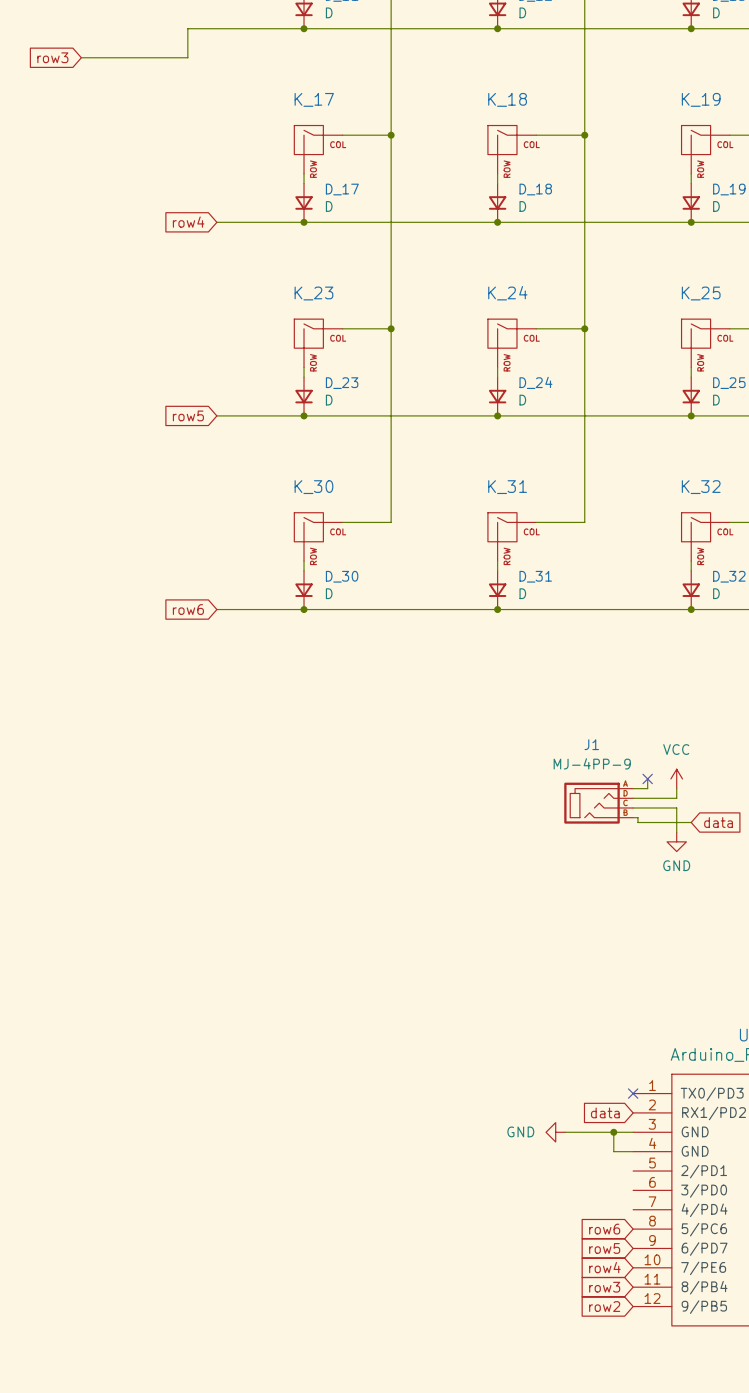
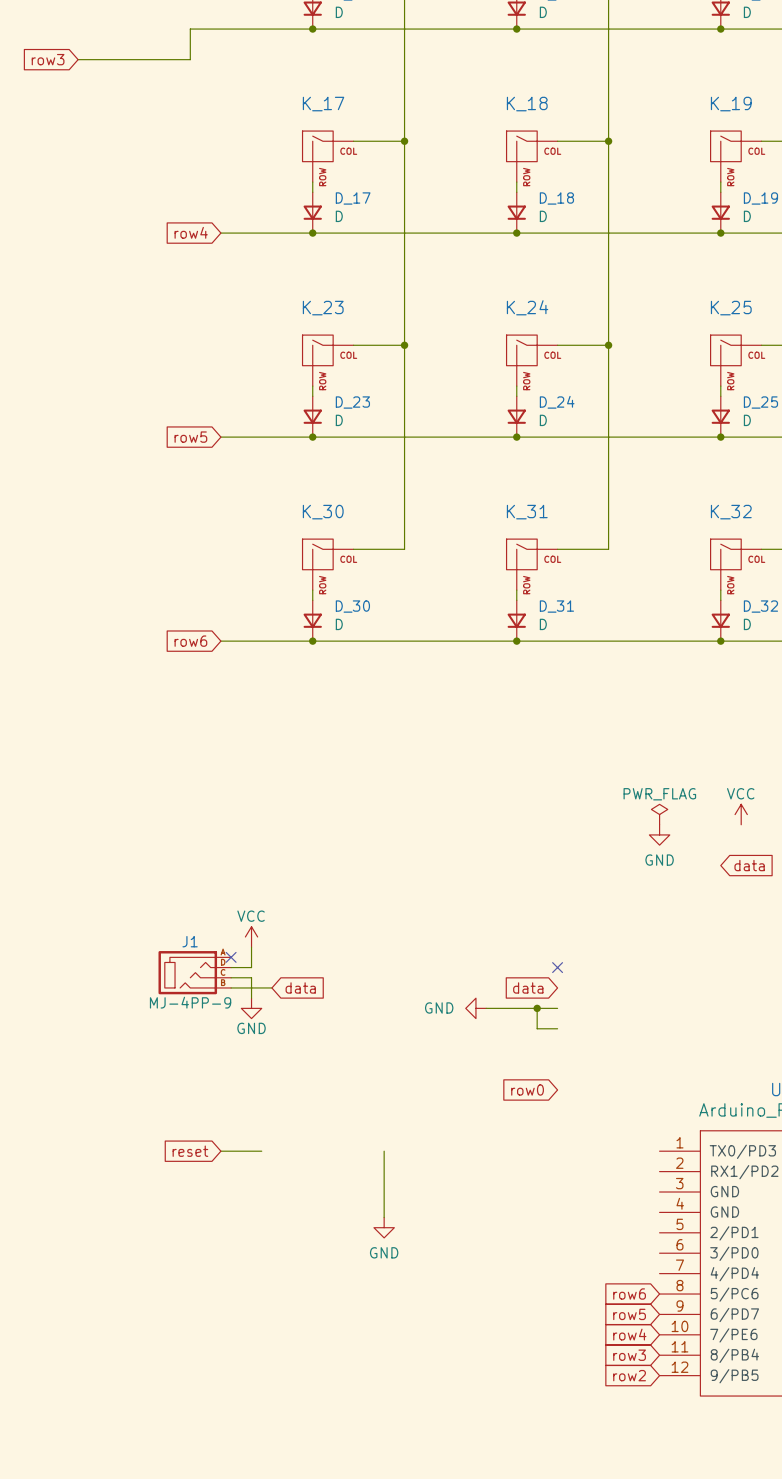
J1 name position: J1 (591, 744) -> J1 (190, 941)
power symbol text position: VCC (676, 749) -> VCC (740, 793)
J1 value position: MJ-4PP-9 (592, 763) -> MJ-4PP-9 (190, 1002)
power symbol: none -> PWR_FLAG (659, 814)
wire: (647, 778) (647, 788) (633, 788) -> none
no-connect mark: (647, 778) -> none
power symbol position: VCC (676, 778) -> VCC (741, 814)
wire: (676, 788) (676, 798) (633, 798) -> none
J1 position: (598, 803) -> (194, 972)
wire: (633, 807) (676, 807) (676, 832) -> none
wire: (633, 817) (637, 817) (637, 822) (691, 822) -> none
power symbol position: GND (676, 841) -> GND (659, 834)
power symbol: none -> VCC (251, 936)
wire: none -> (251, 947) (251, 967) (231, 967)
no-connect mark: none -> (231, 957)
no-connect mark: none -> (557, 967)
wire: none -> (231, 977) (251, 977) (251, 998)
wire: none -> (231, 987) (271, 987)
global label: none -> data (300, 987)
global label: none -> data (528, 987)
power symbol: none -> GND (251, 1008)
power symbol: none -> GND (475, 1008)
wire: none -> (486, 1008) (557, 1008)
wire: none -> (537, 1008) (537, 1028) (557, 1028)
junction: none -> (537, 1008)
global label: none -> row0 (527, 1089)
global label: none -> reset (190, 1151)
wire: none -> (220, 1151) (261, 1151)
wire: none -> (384, 1151) (384, 1217)
no-connect mark: (633, 1093) -> none
global label: data (605, 1112) -> none
power symbol: GND (555, 1132) -> none
wire: (565, 1132) (633, 1132) -> none
wire: (613, 1132) (613, 1151) (633, 1151) -> none
junction: (613, 1132) -> none
power symbol: none -> GND (384, 1227)

